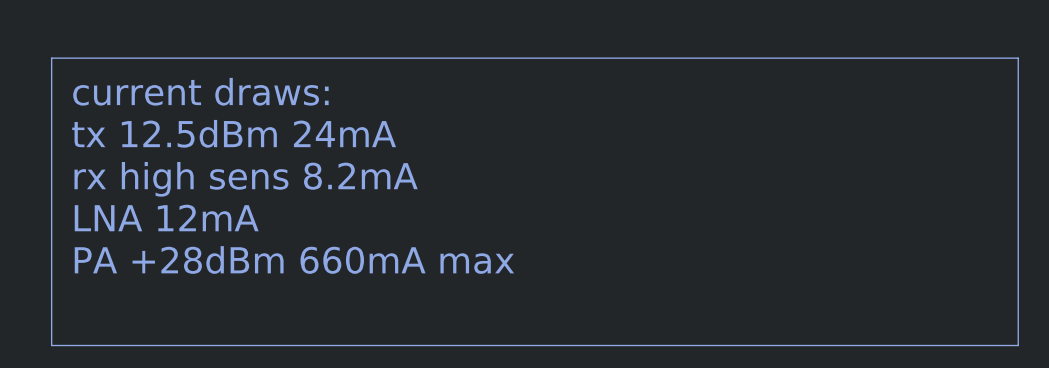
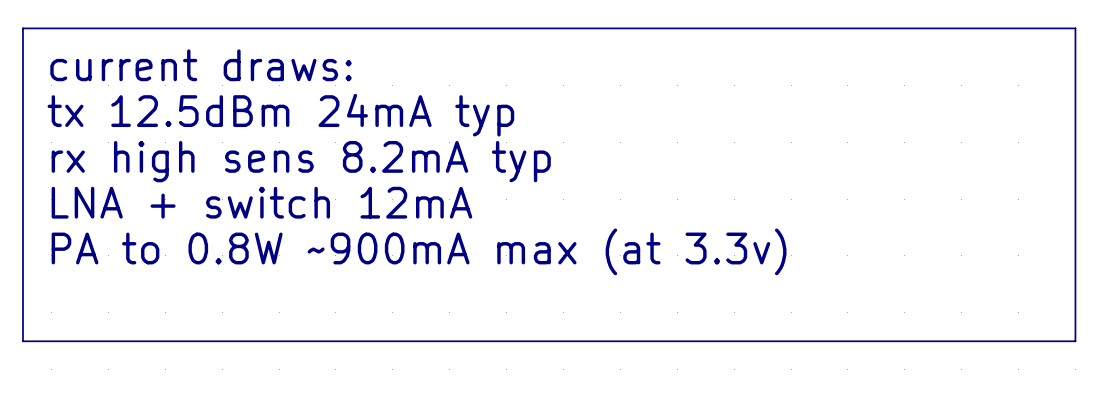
text: tx 12.5dBm 24mA (234, 133) -> tx 12.5dBm 24mA typ (280, 115)
text: rx high sens 8.2mA (246, 179) -> rx high sens 8.2mA typ (301, 161)
text: LNA 12mA (166, 217) -> LNA + switch 12mA (261, 202)
text: PA +28dBm 660mA max (294, 259) -> PA to 0.8W ~900mA max (at 3.3v) (419, 251)

